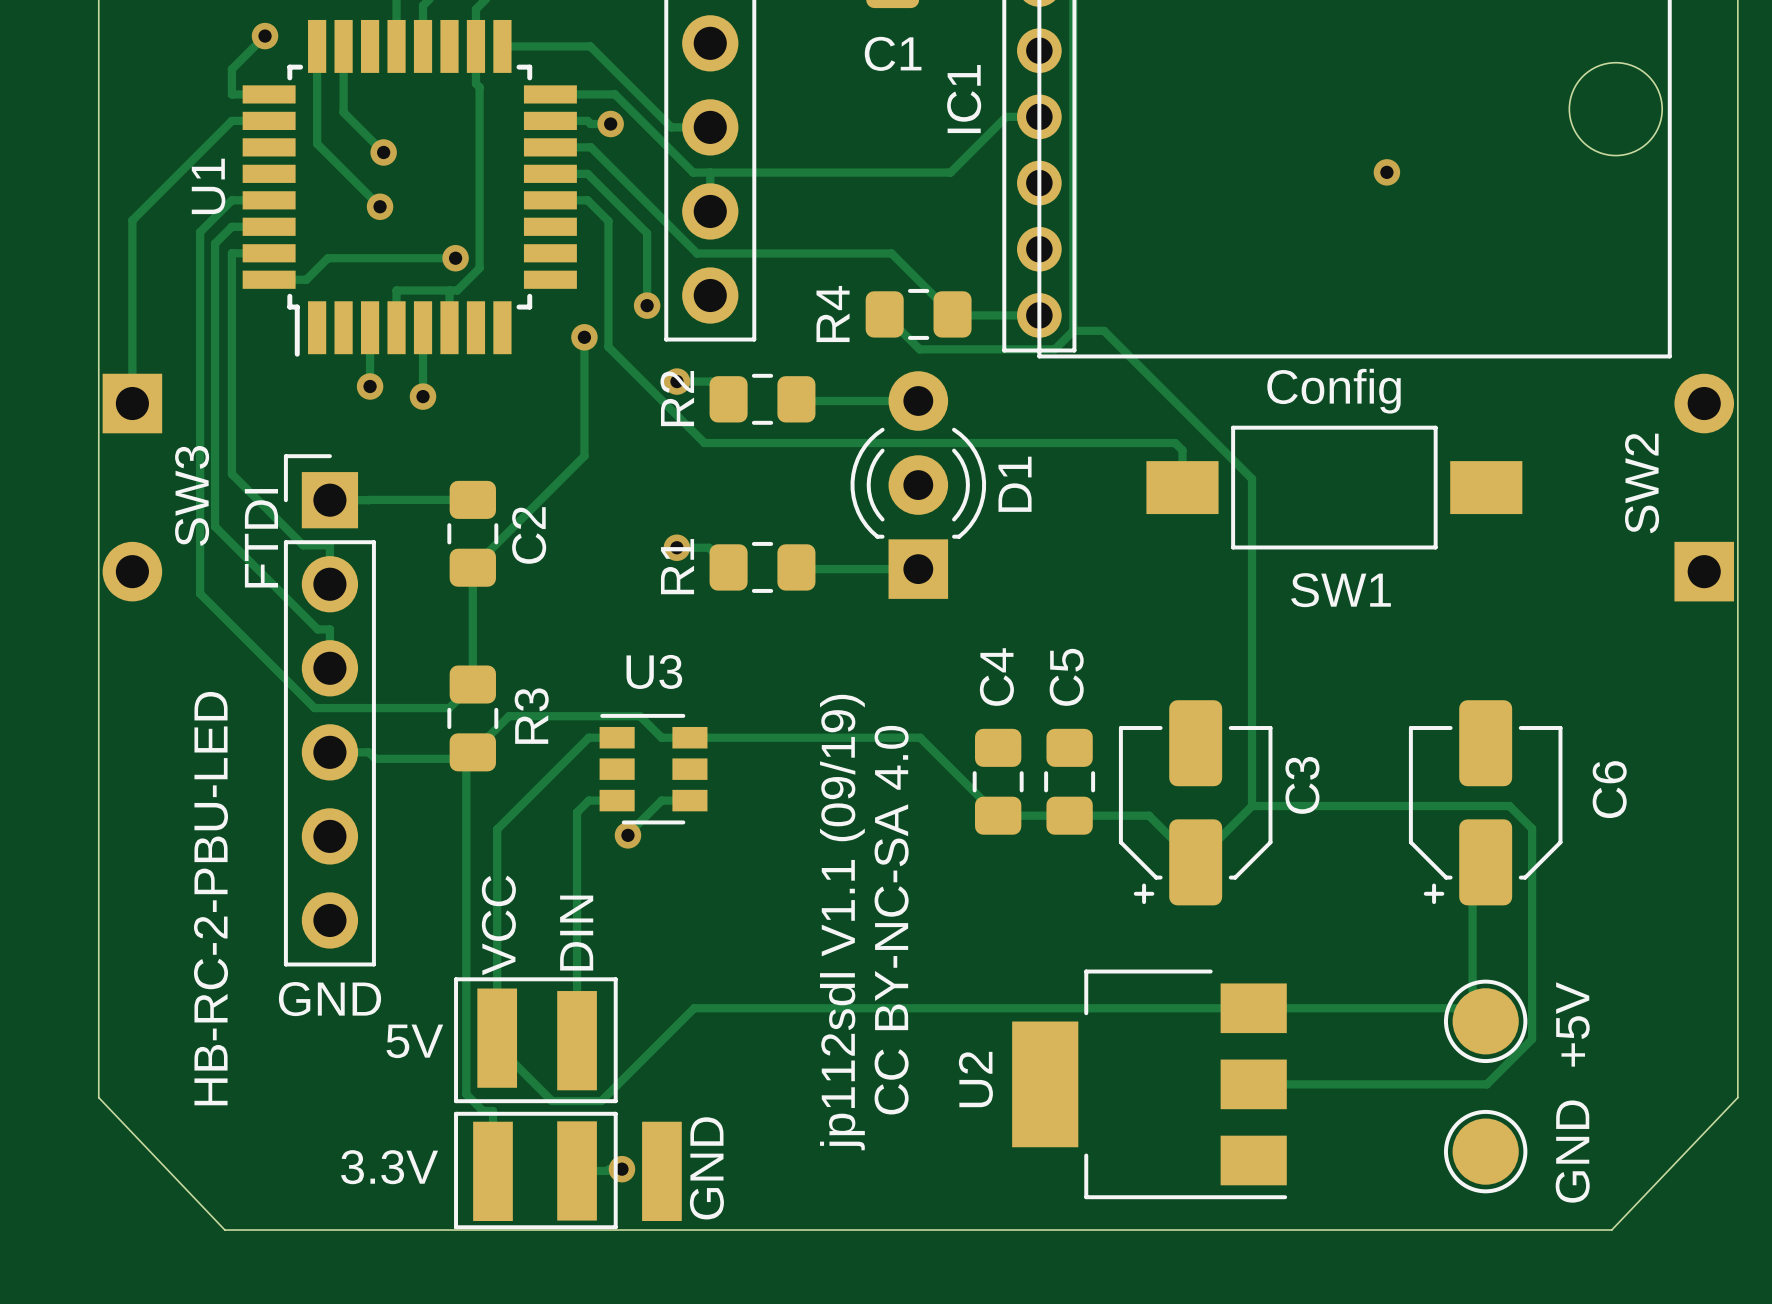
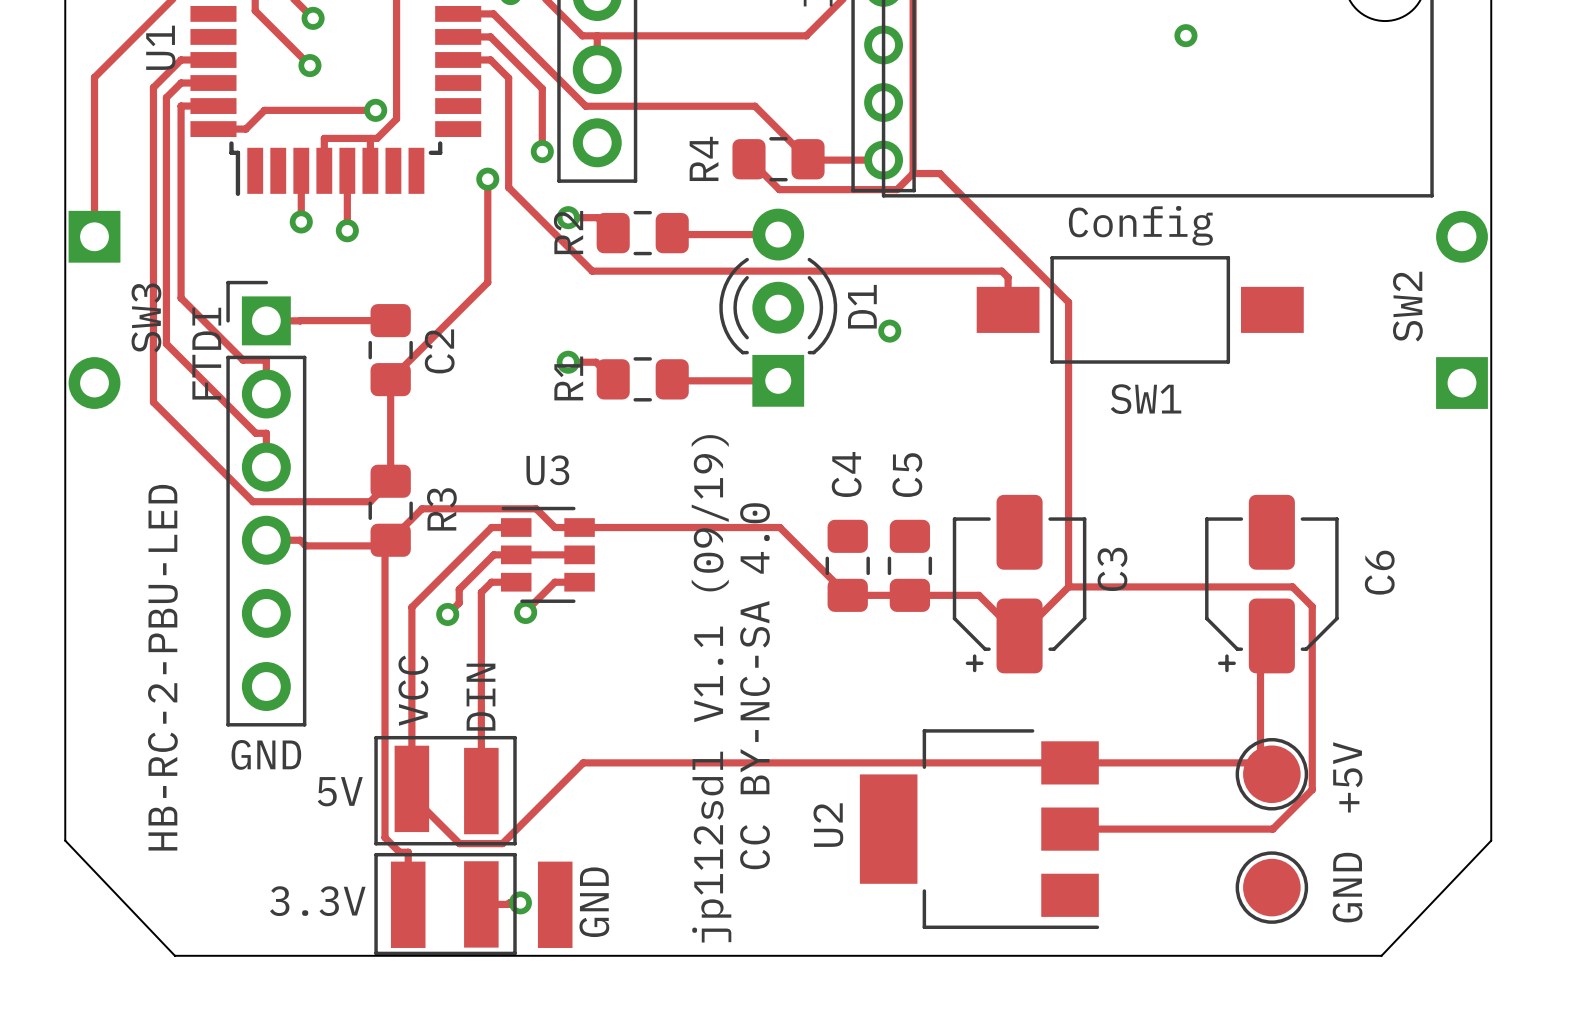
via: none -> (889, 331)
track: none -> (579, 554) (493, 554) (459, 589) (459, 602) (447, 614)
via: none -> (447, 614)

